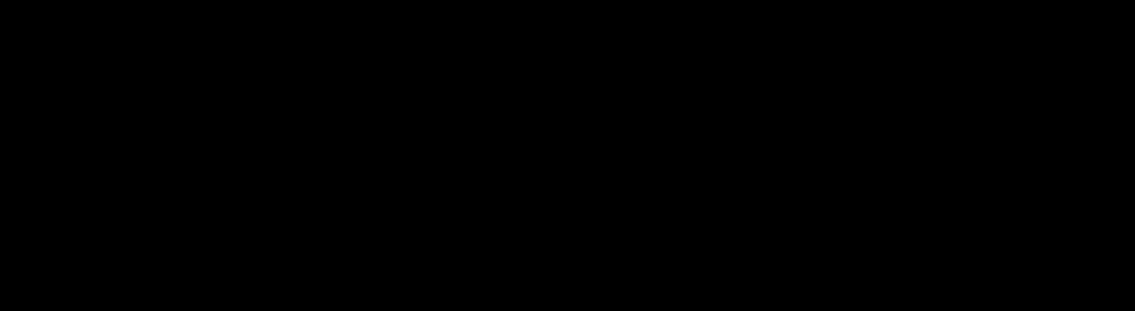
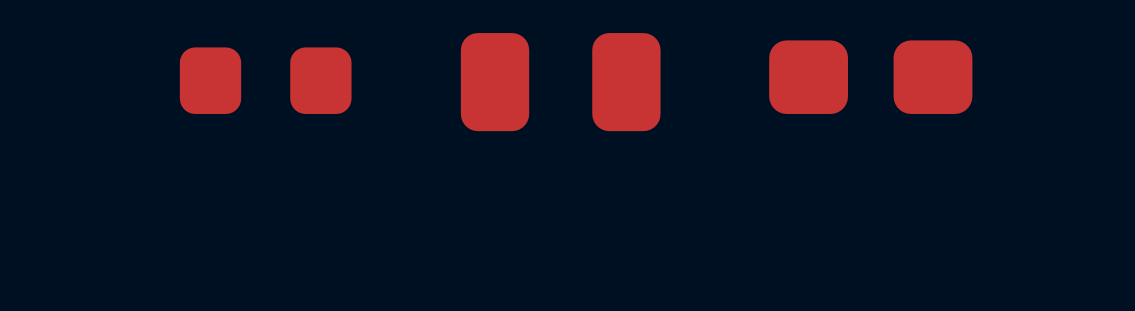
part: none -> (870, 77)
part: none -> (265, 80)
part: none -> (560, 82)

